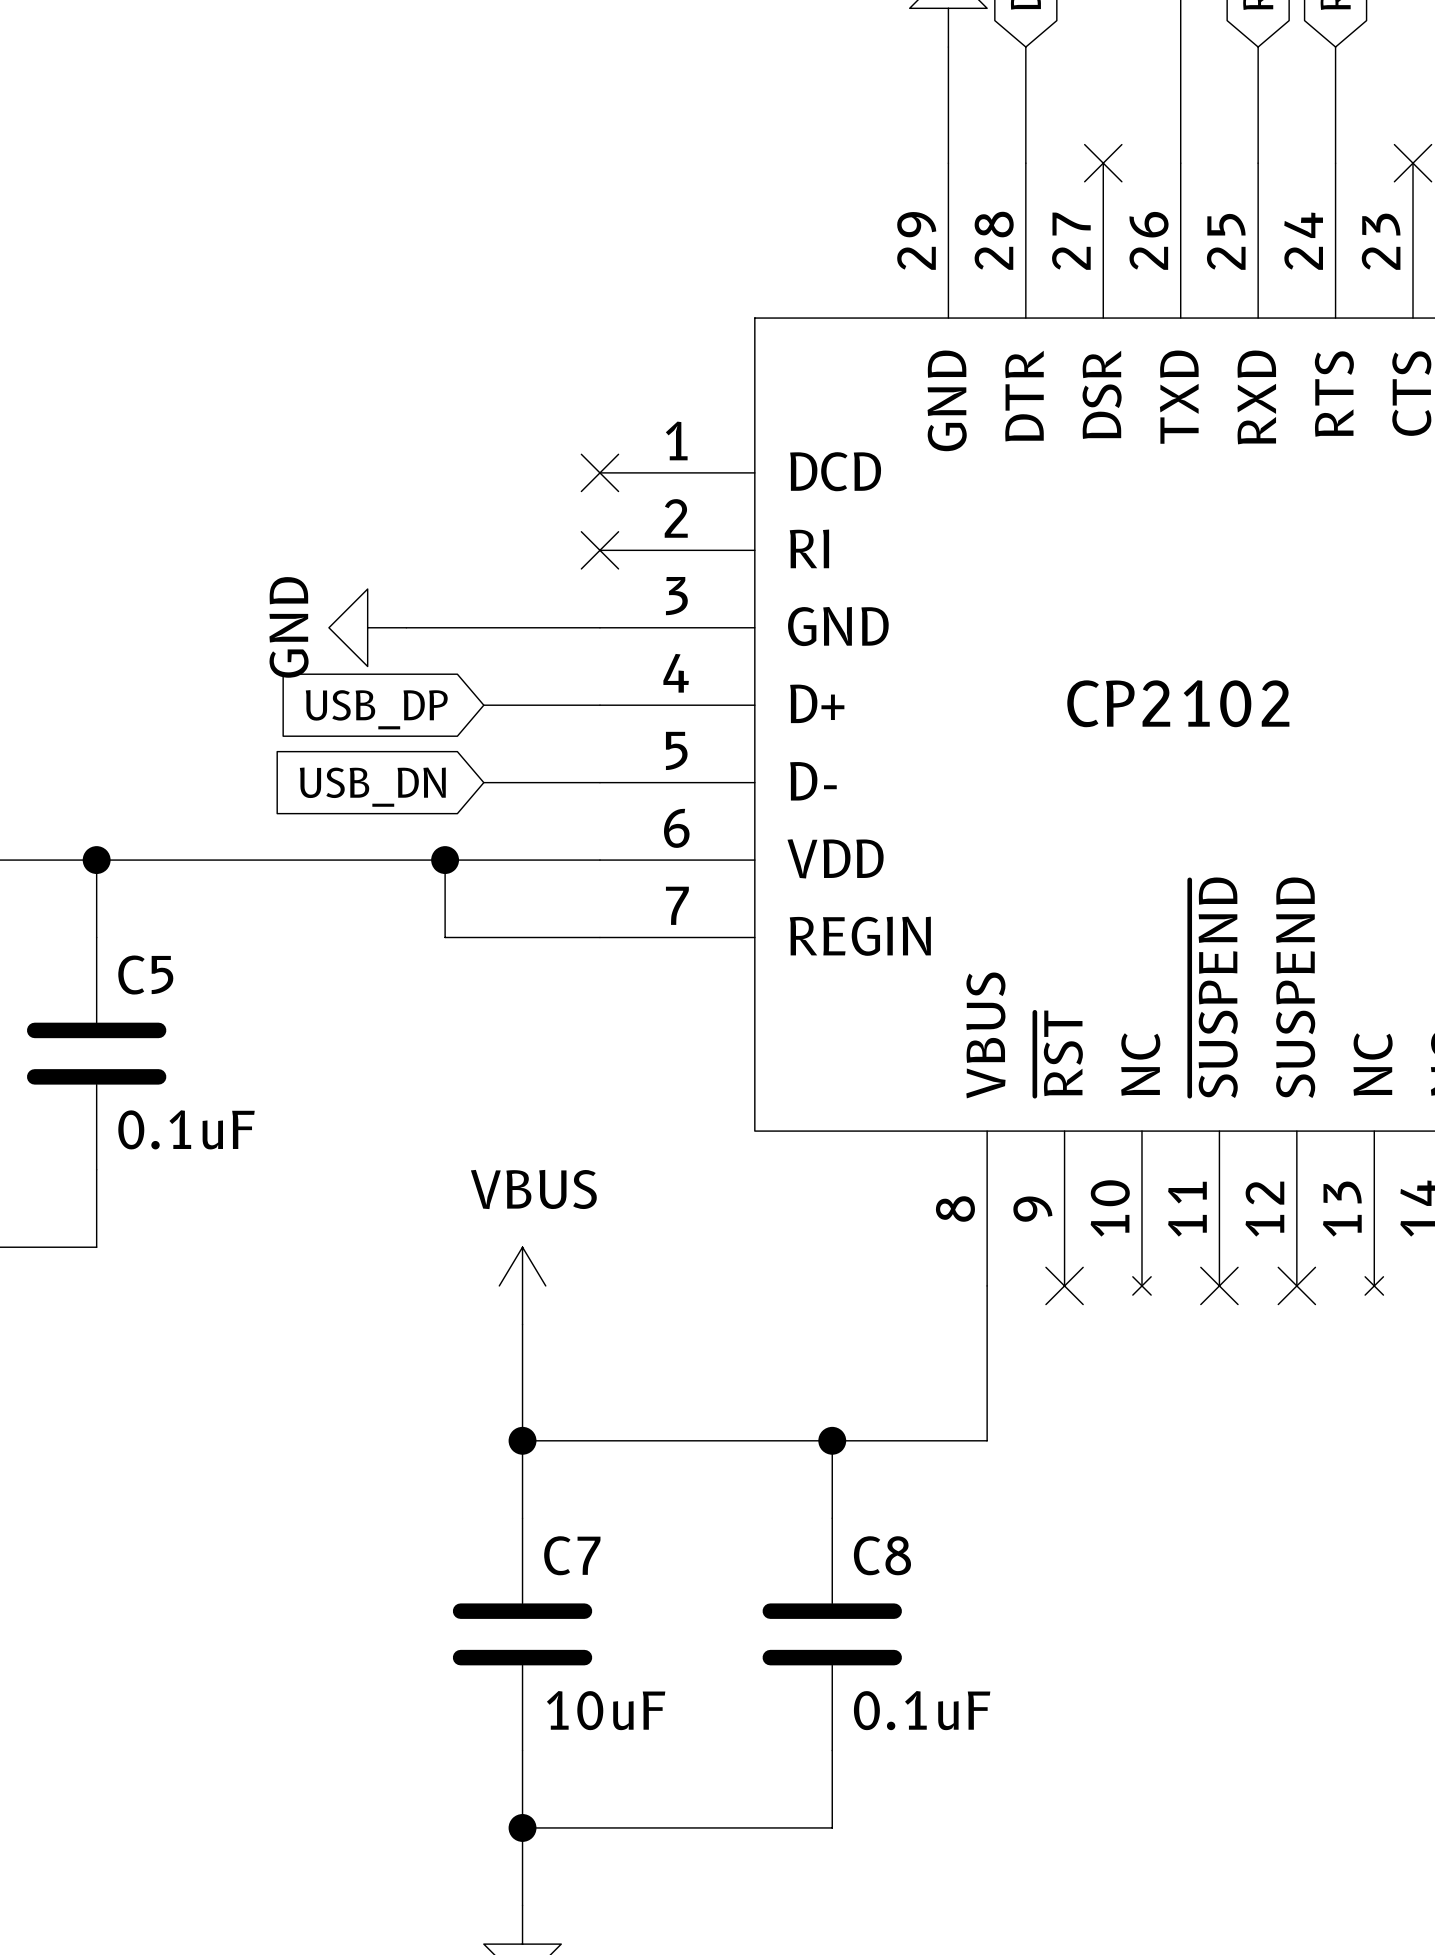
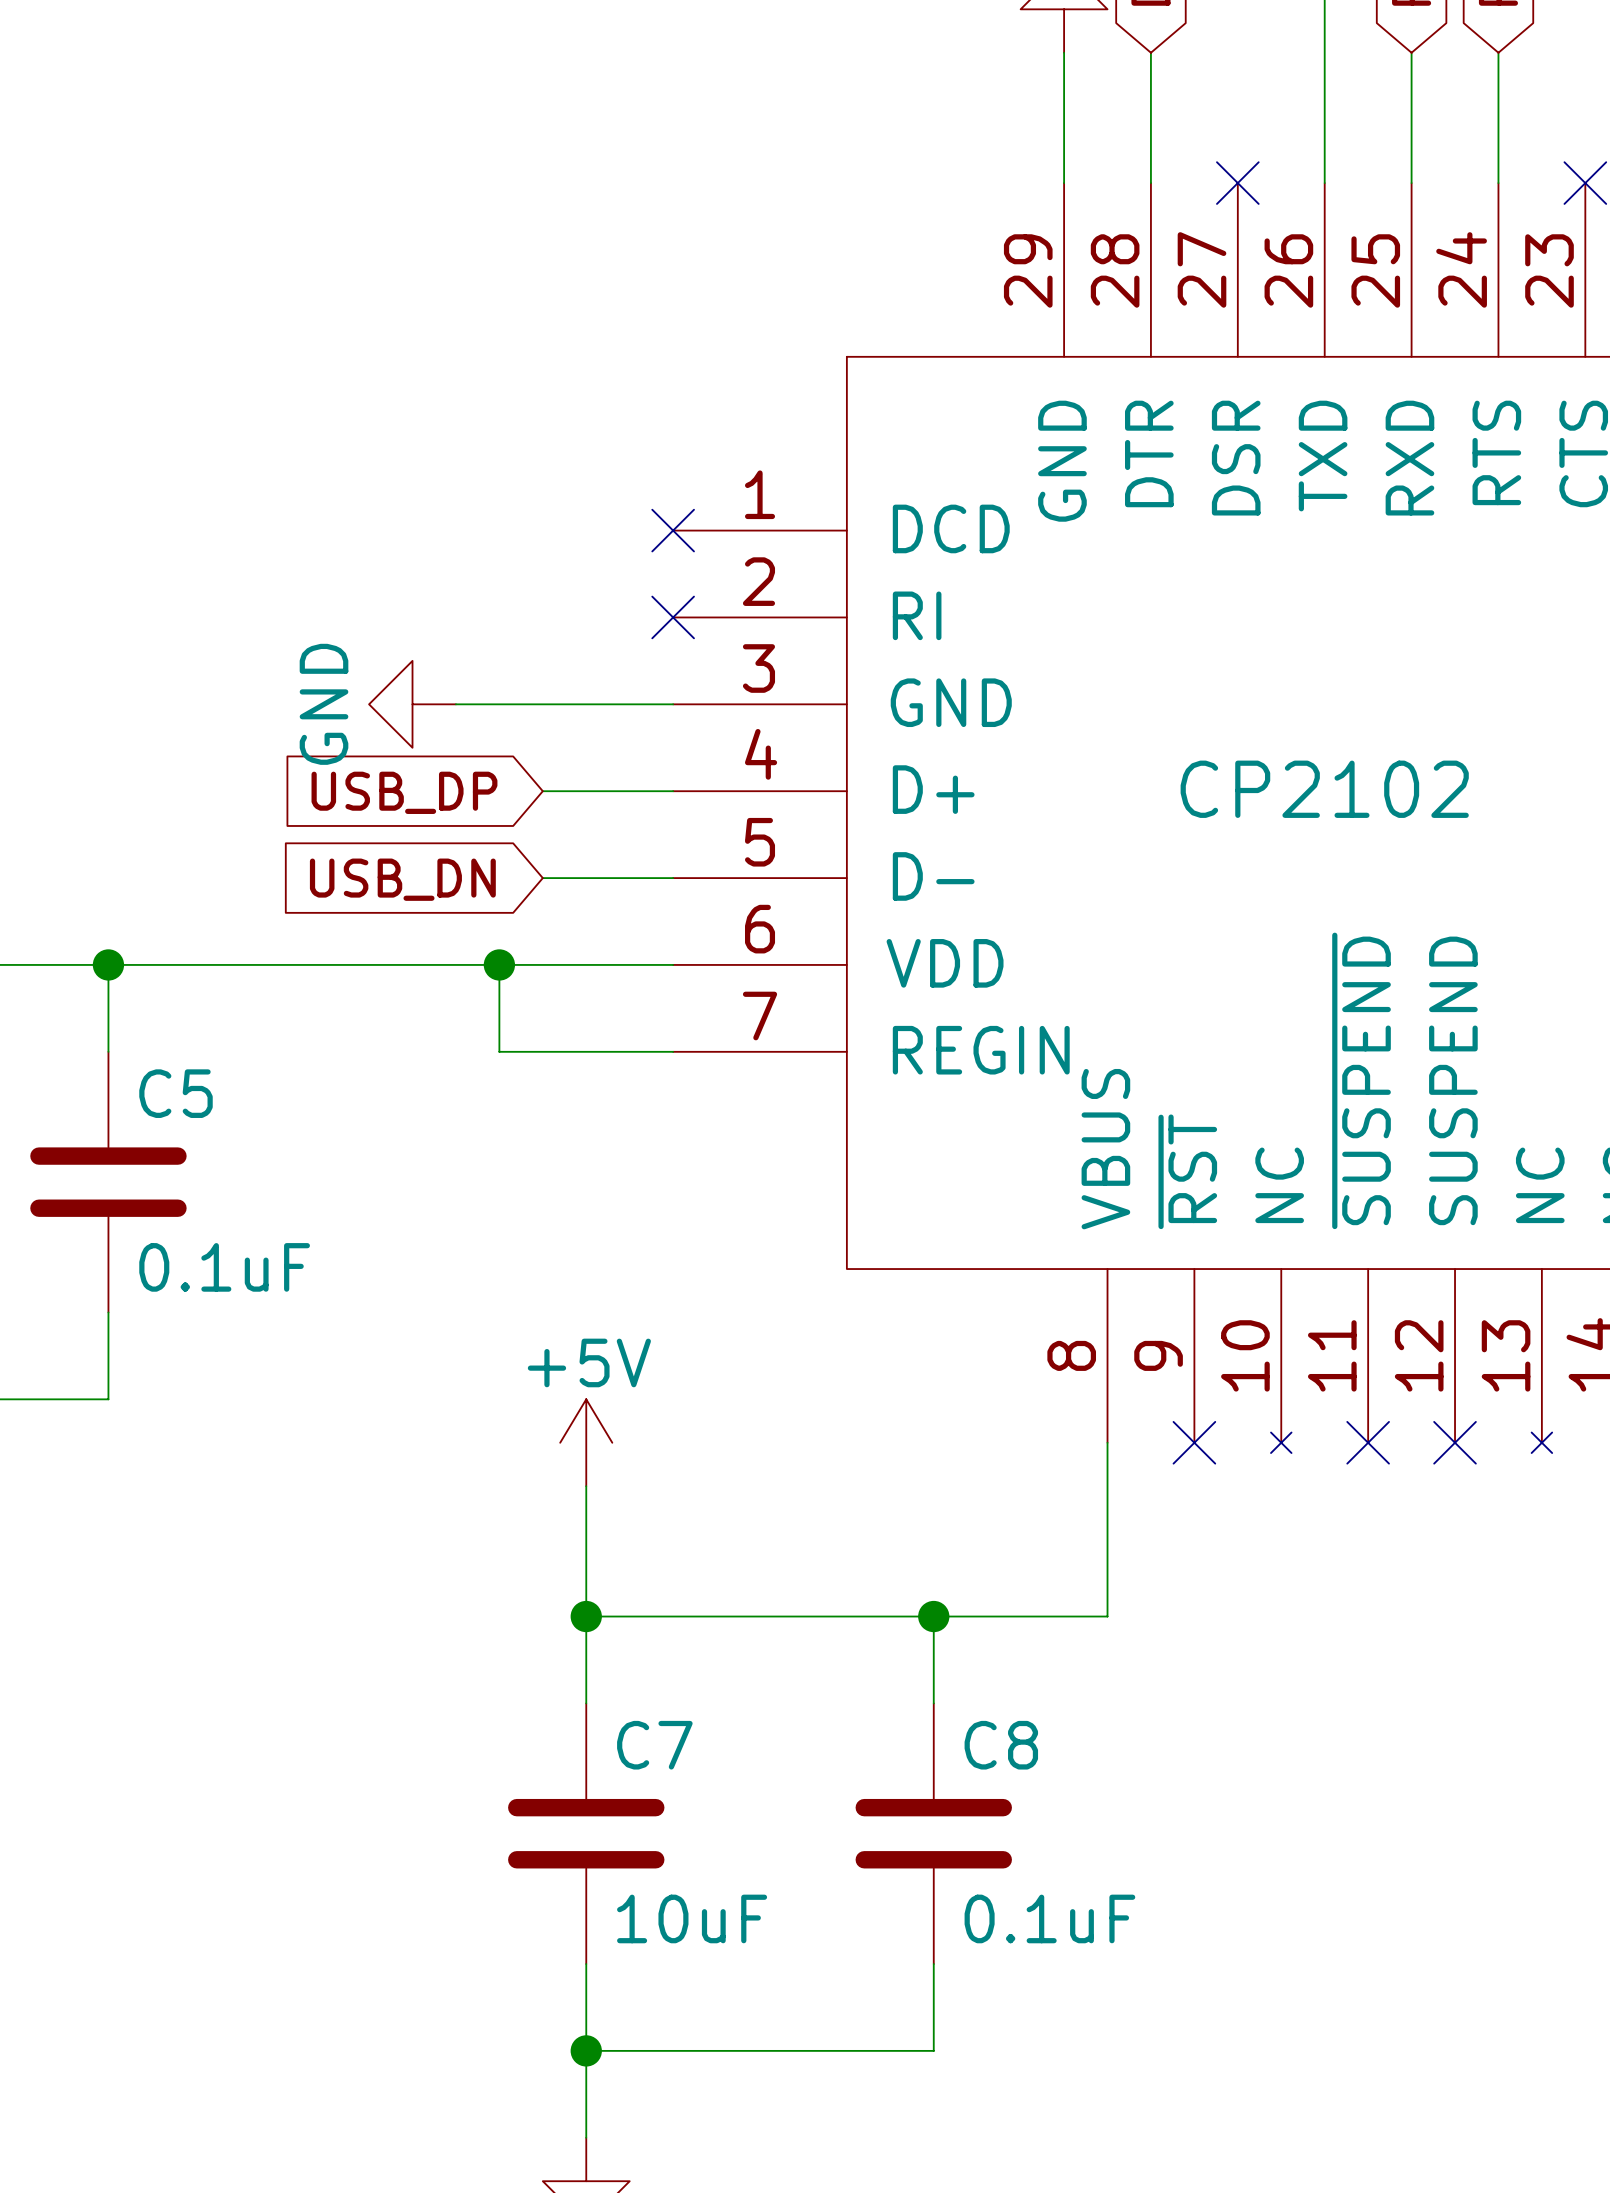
power symbol: VBUS (522, 1285) -> +5V (586, 1442)

